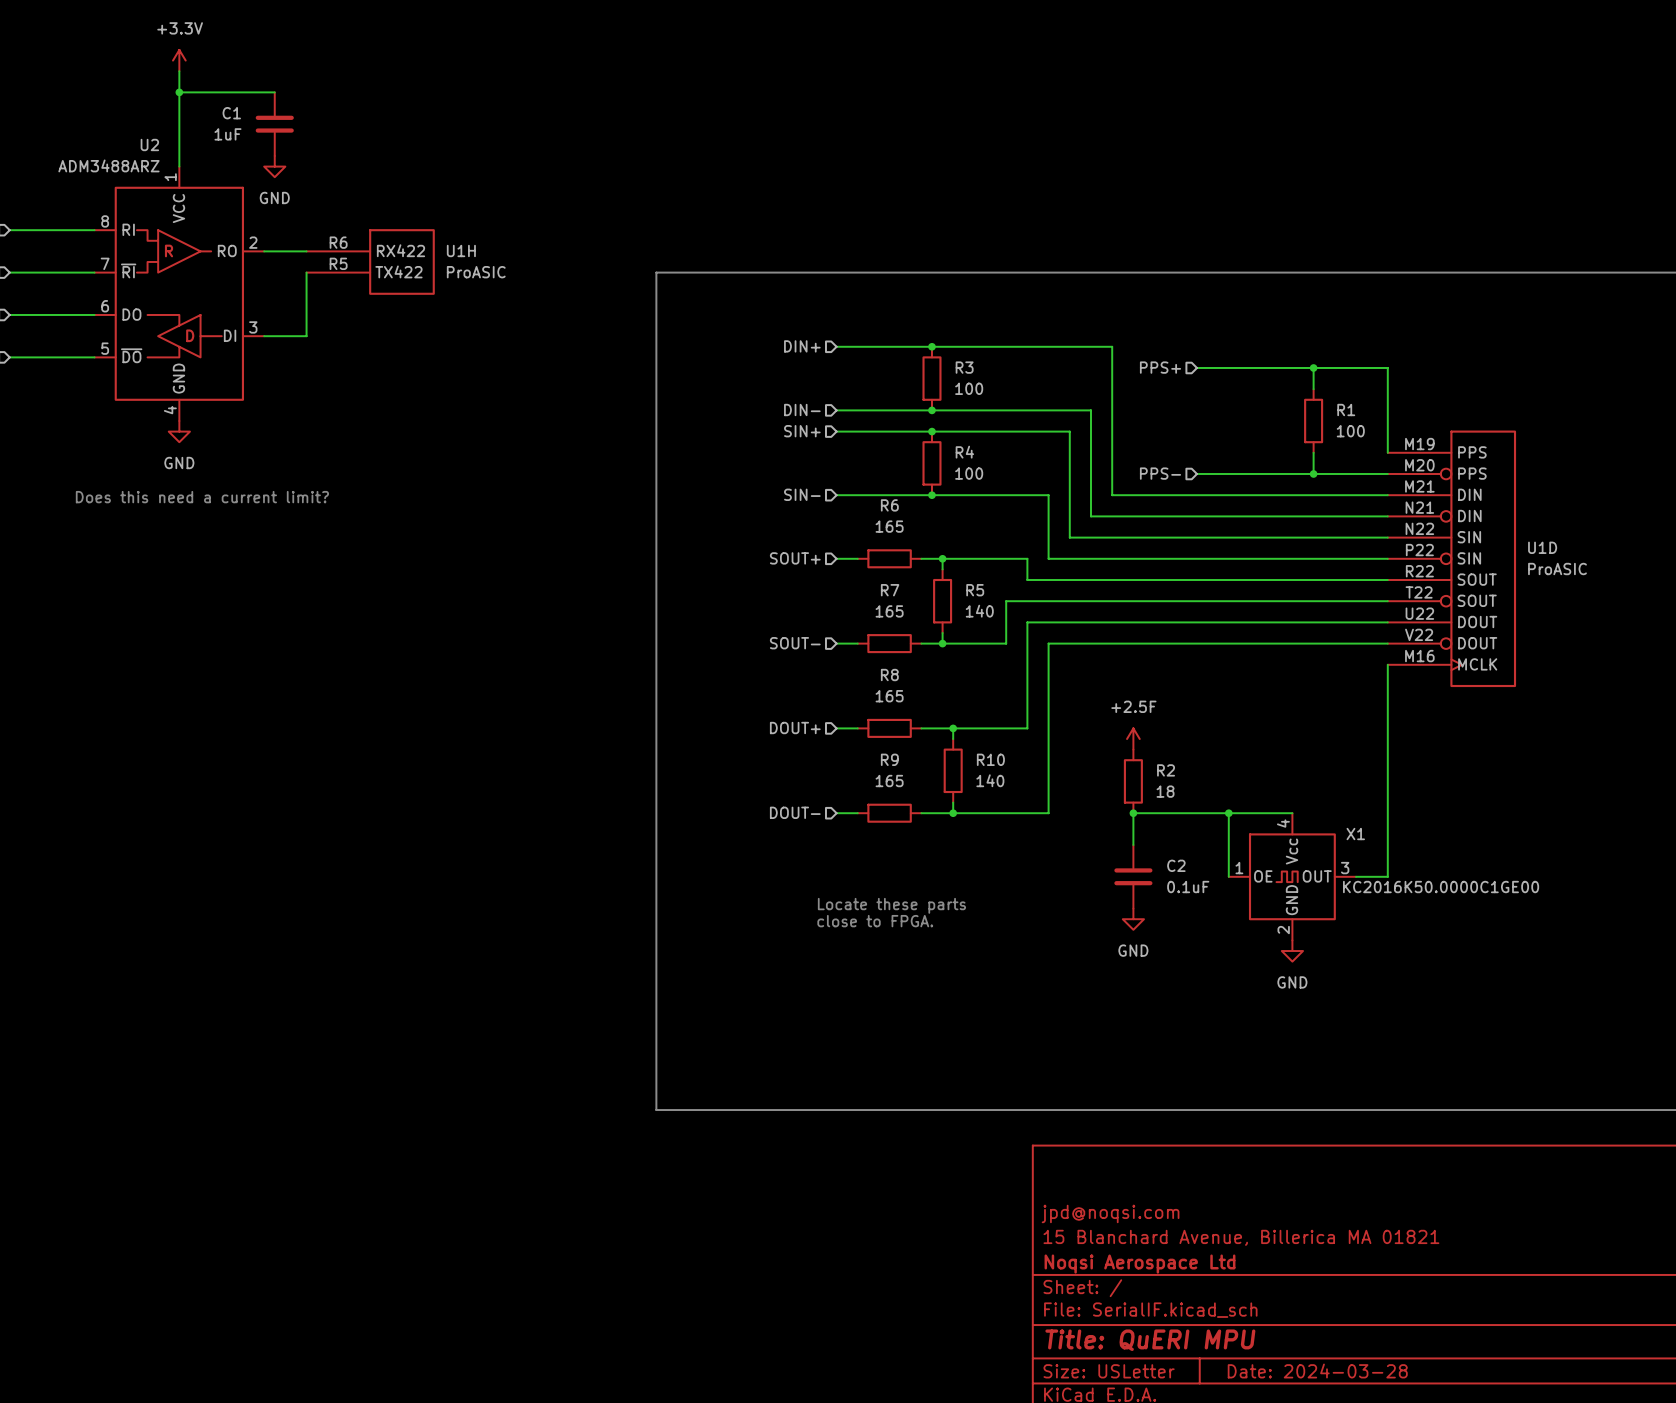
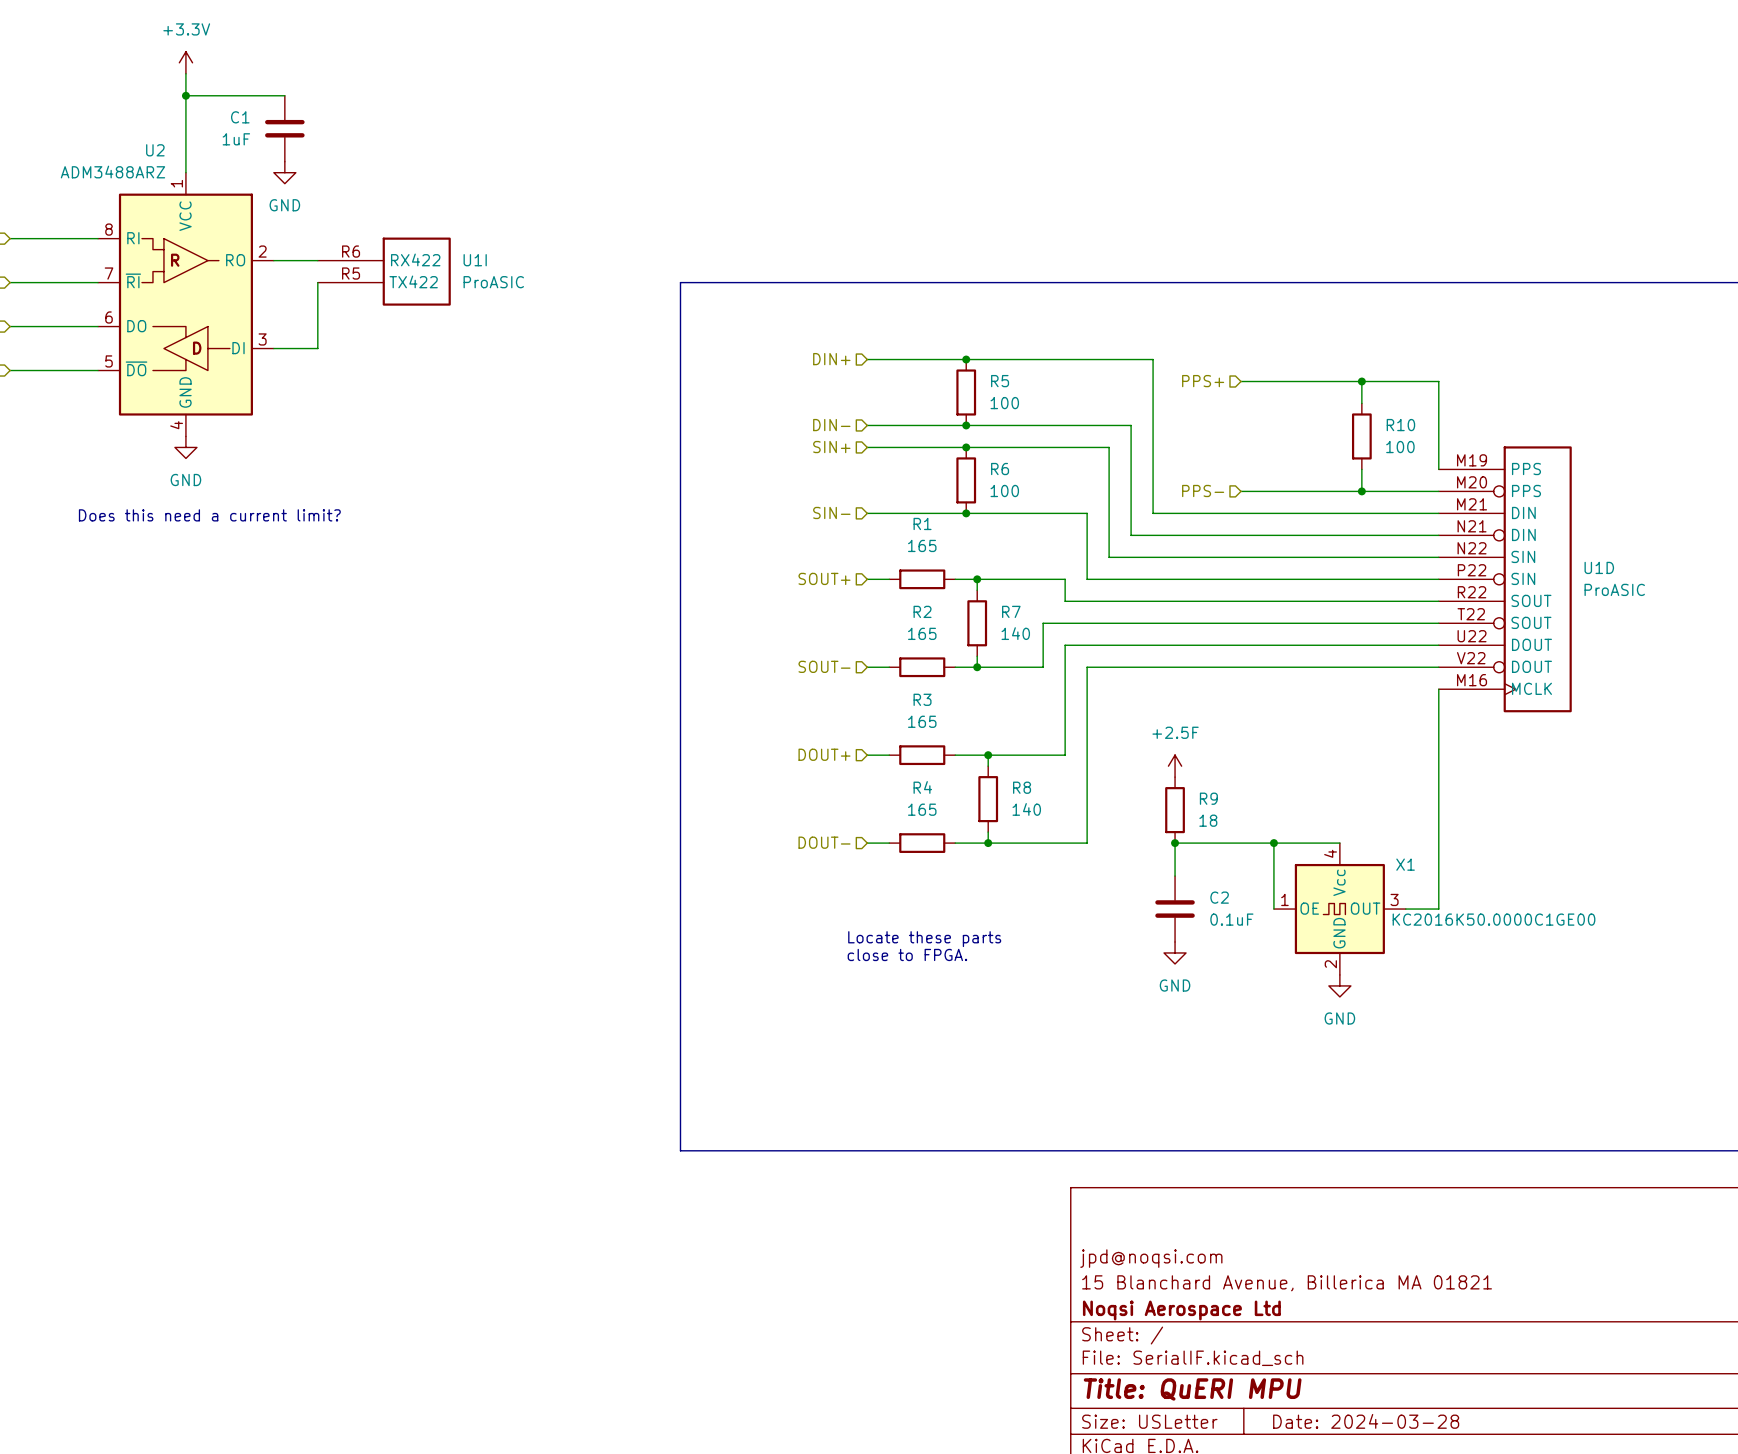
U1H name: U1H (461, 250) -> U1I (475, 260)
R3 name: R3 (964, 367) -> R5 (1000, 381)
R1 name: R1 (1346, 409) -> R10 (1400, 425)
R4 name: R4 (964, 452) -> R6 (1000, 469)
R6 name: R6 (889, 505) -> R1 (922, 523)
R7 name: R7 (890, 590) -> R2 (922, 611)
R5 name: R5 (975, 590) -> R7 (1011, 611)
R8 name: R8 (889, 675) -> R3 (922, 699)
R9 name: R9 (889, 759) -> R4 (922, 787)
R10 name: R10 (990, 759) -> R8 (1022, 787)
R2 name: R2 (1166, 770) -> R9 (1208, 798)

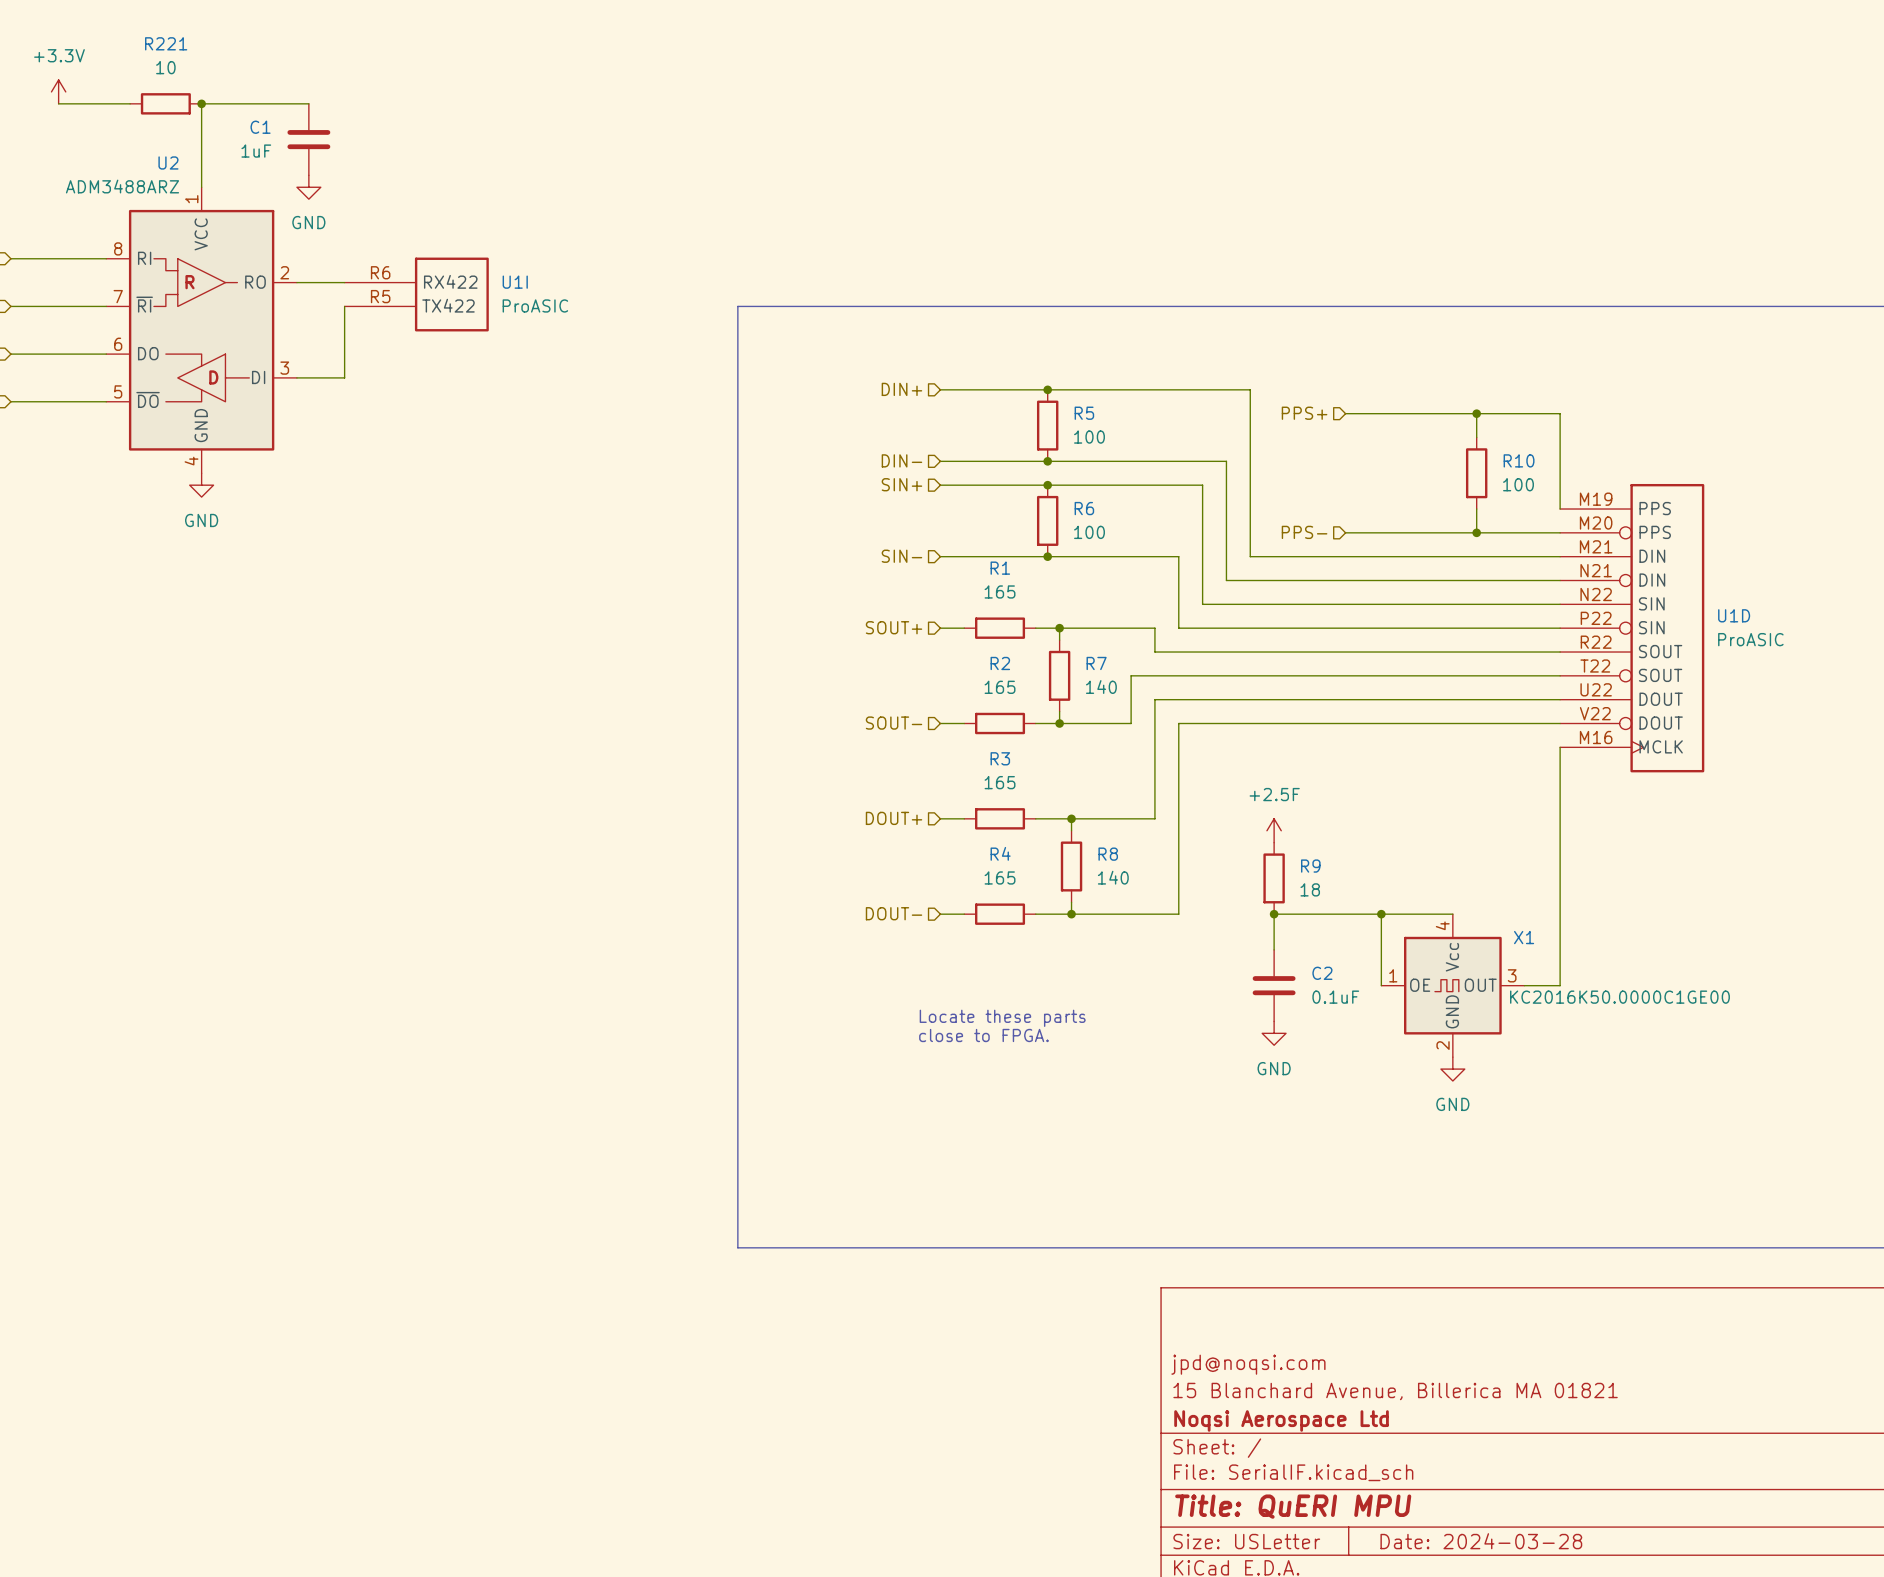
power symbol position: +3.3V (185, 62) -> +3.3V (58, 91)
wire: (185, 73) (185, 95) -> none
wire: none -> (58, 103) (130, 103)
R221: none -> 10 (165, 103)
text: Does this need a current limit? (209, 515) -> none

